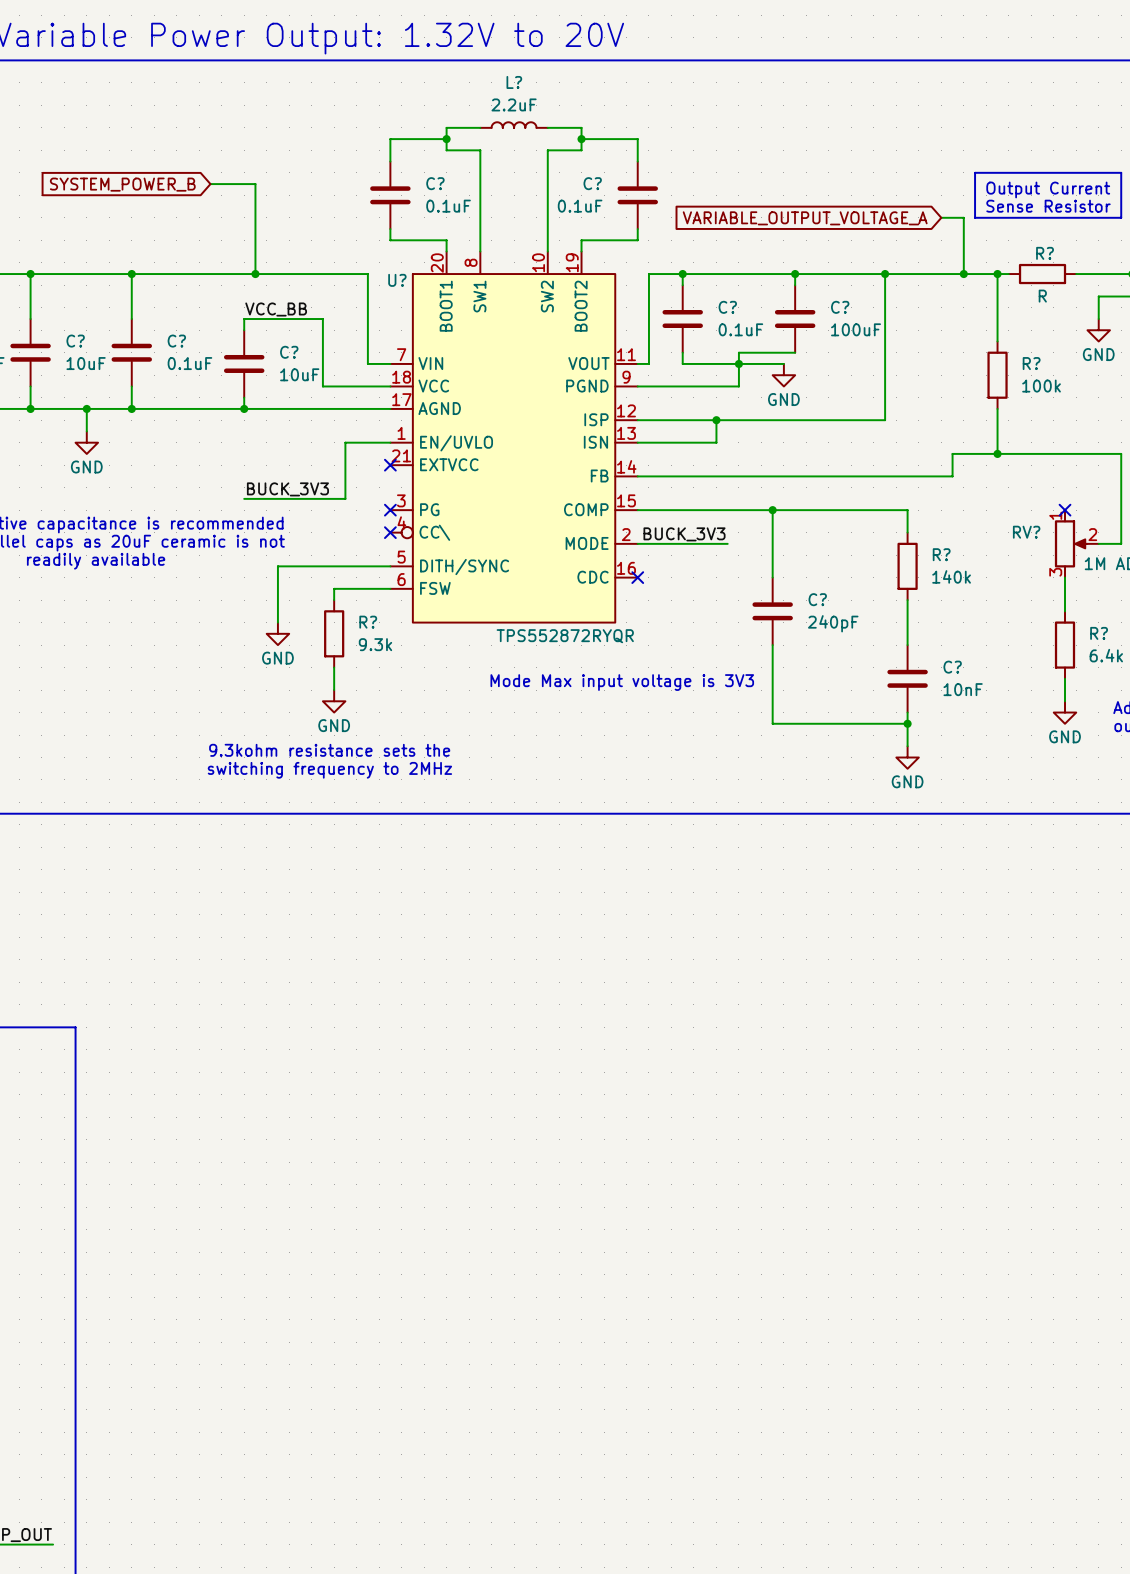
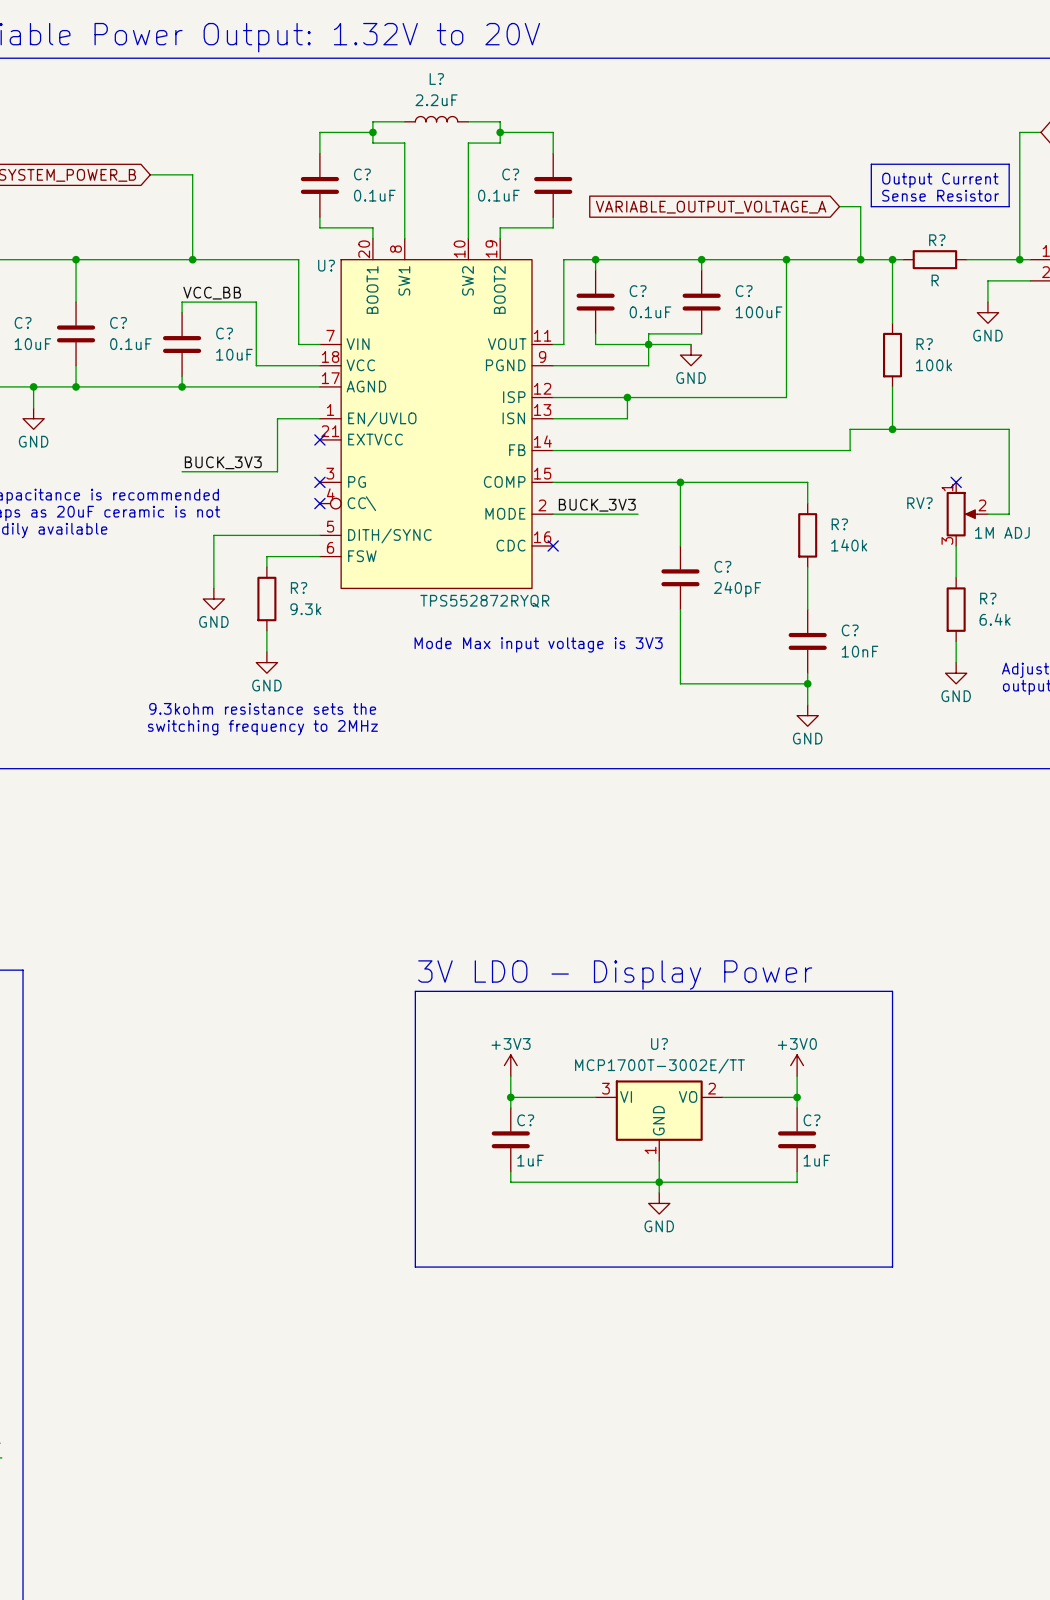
text: none -> 3V LDO - Display Power (615, 975)
line: none -> (415, 991) (892, 991) (892, 1267) (415, 1267) (415, 991)
power symbol: none -> +3V3 (510, 1065)
power symbol: none -> +3V0 (797, 1065)
wire: none -> (510, 1076) (510, 1108)
wire: none -> (797, 1076) (797, 1108)
wire: none -> (510, 1097) (595, 1097)
junction: none -> (510, 1097)
wire: none -> (722, 1097) (797, 1097)
junction: none -> (797, 1097)
U?: none -> MCP1700T-3002E/TT (659, 1120)
C?: none -> 1uF (510, 1139)
C?: none -> 1uF (797, 1139)
wire: none -> (659, 1161) (659, 1192)
wire: none -> (510, 1171) (510, 1182) (797, 1182) (797, 1171)
junction: none -> (659, 1182)
power symbol: none -> GND (659, 1203)

